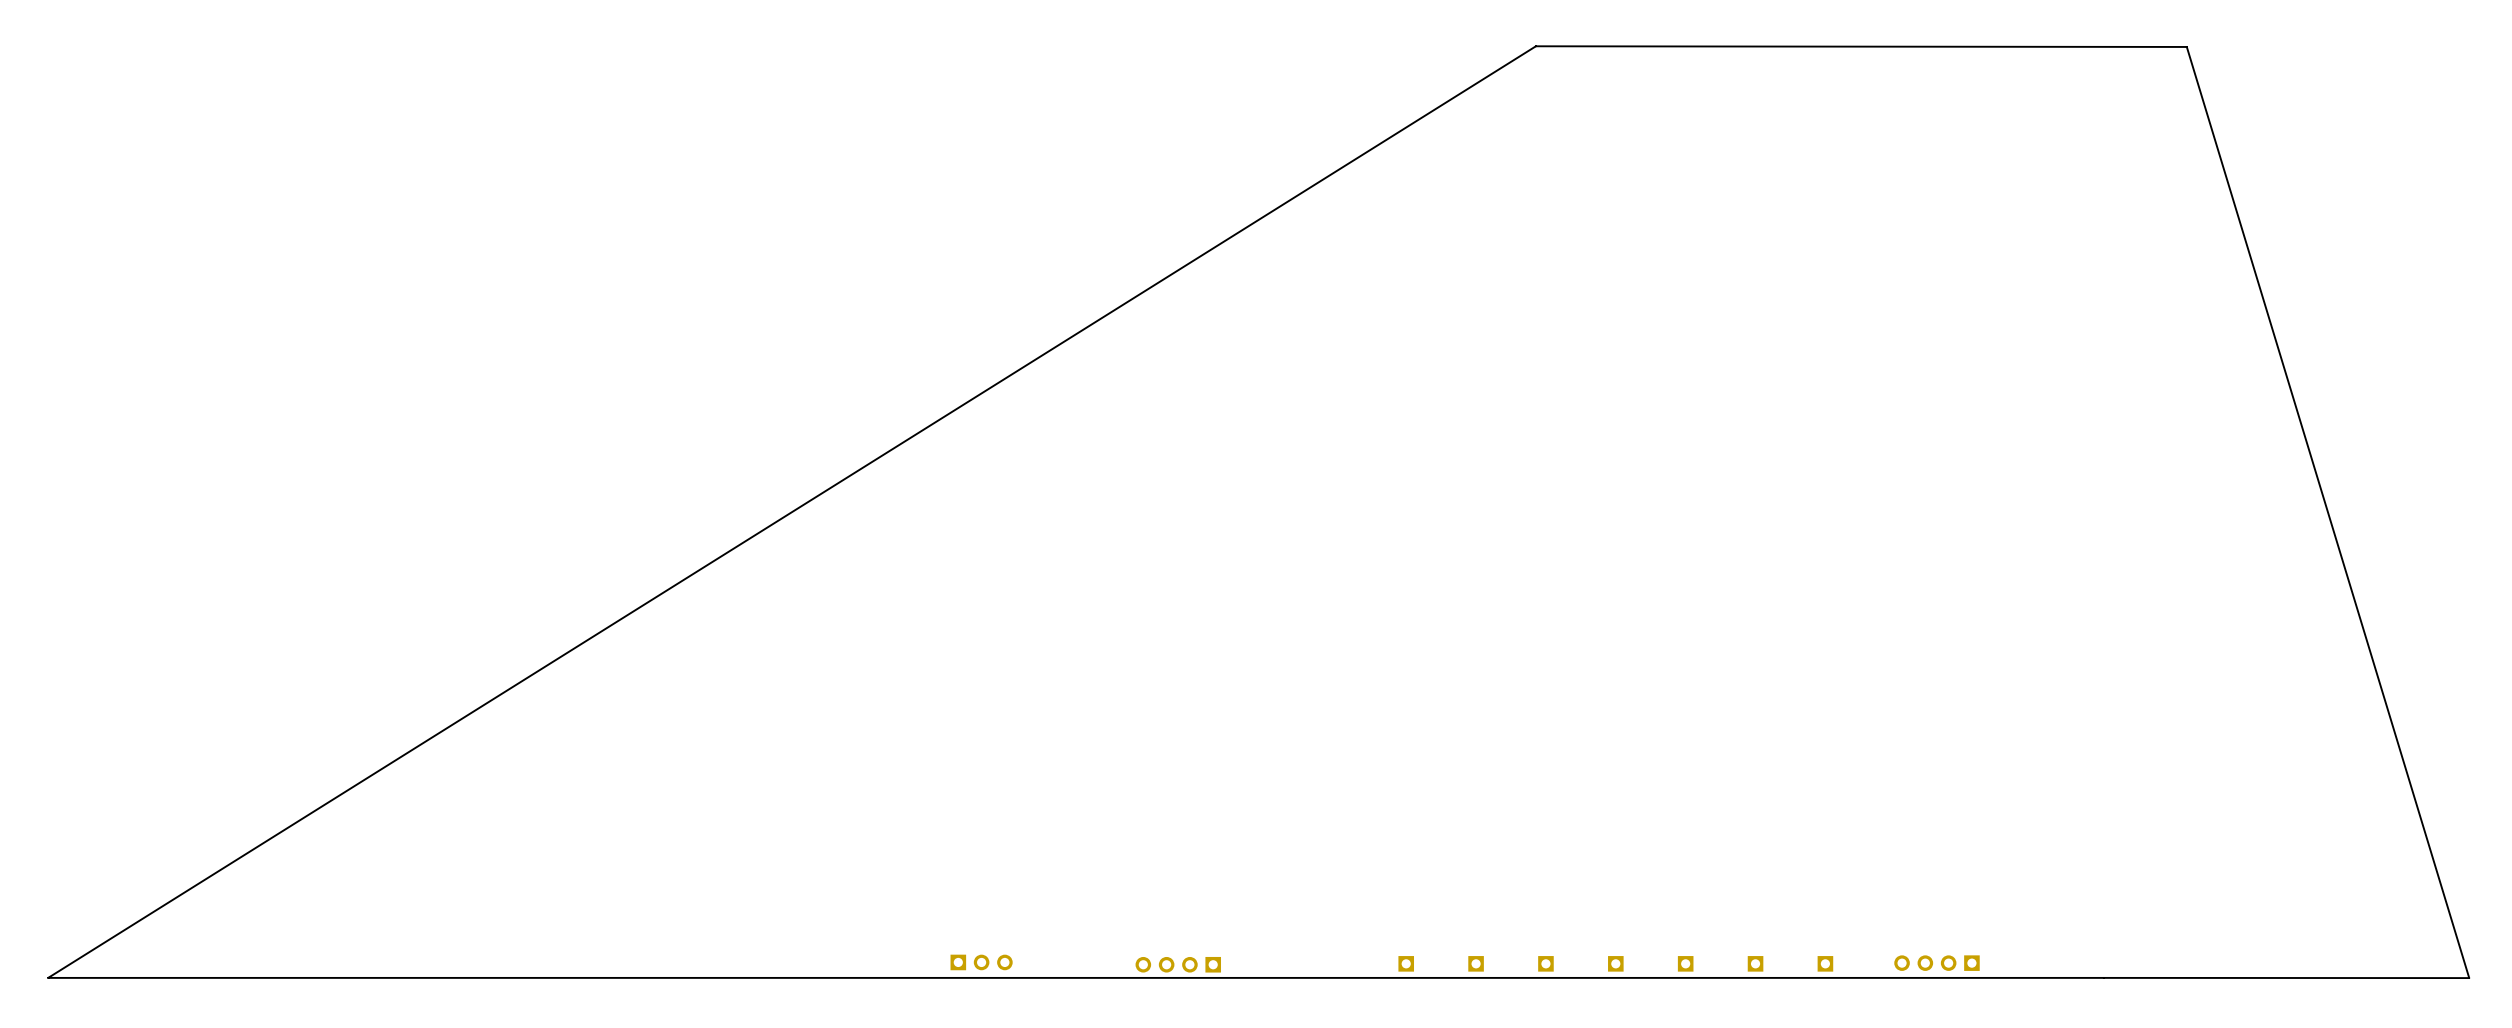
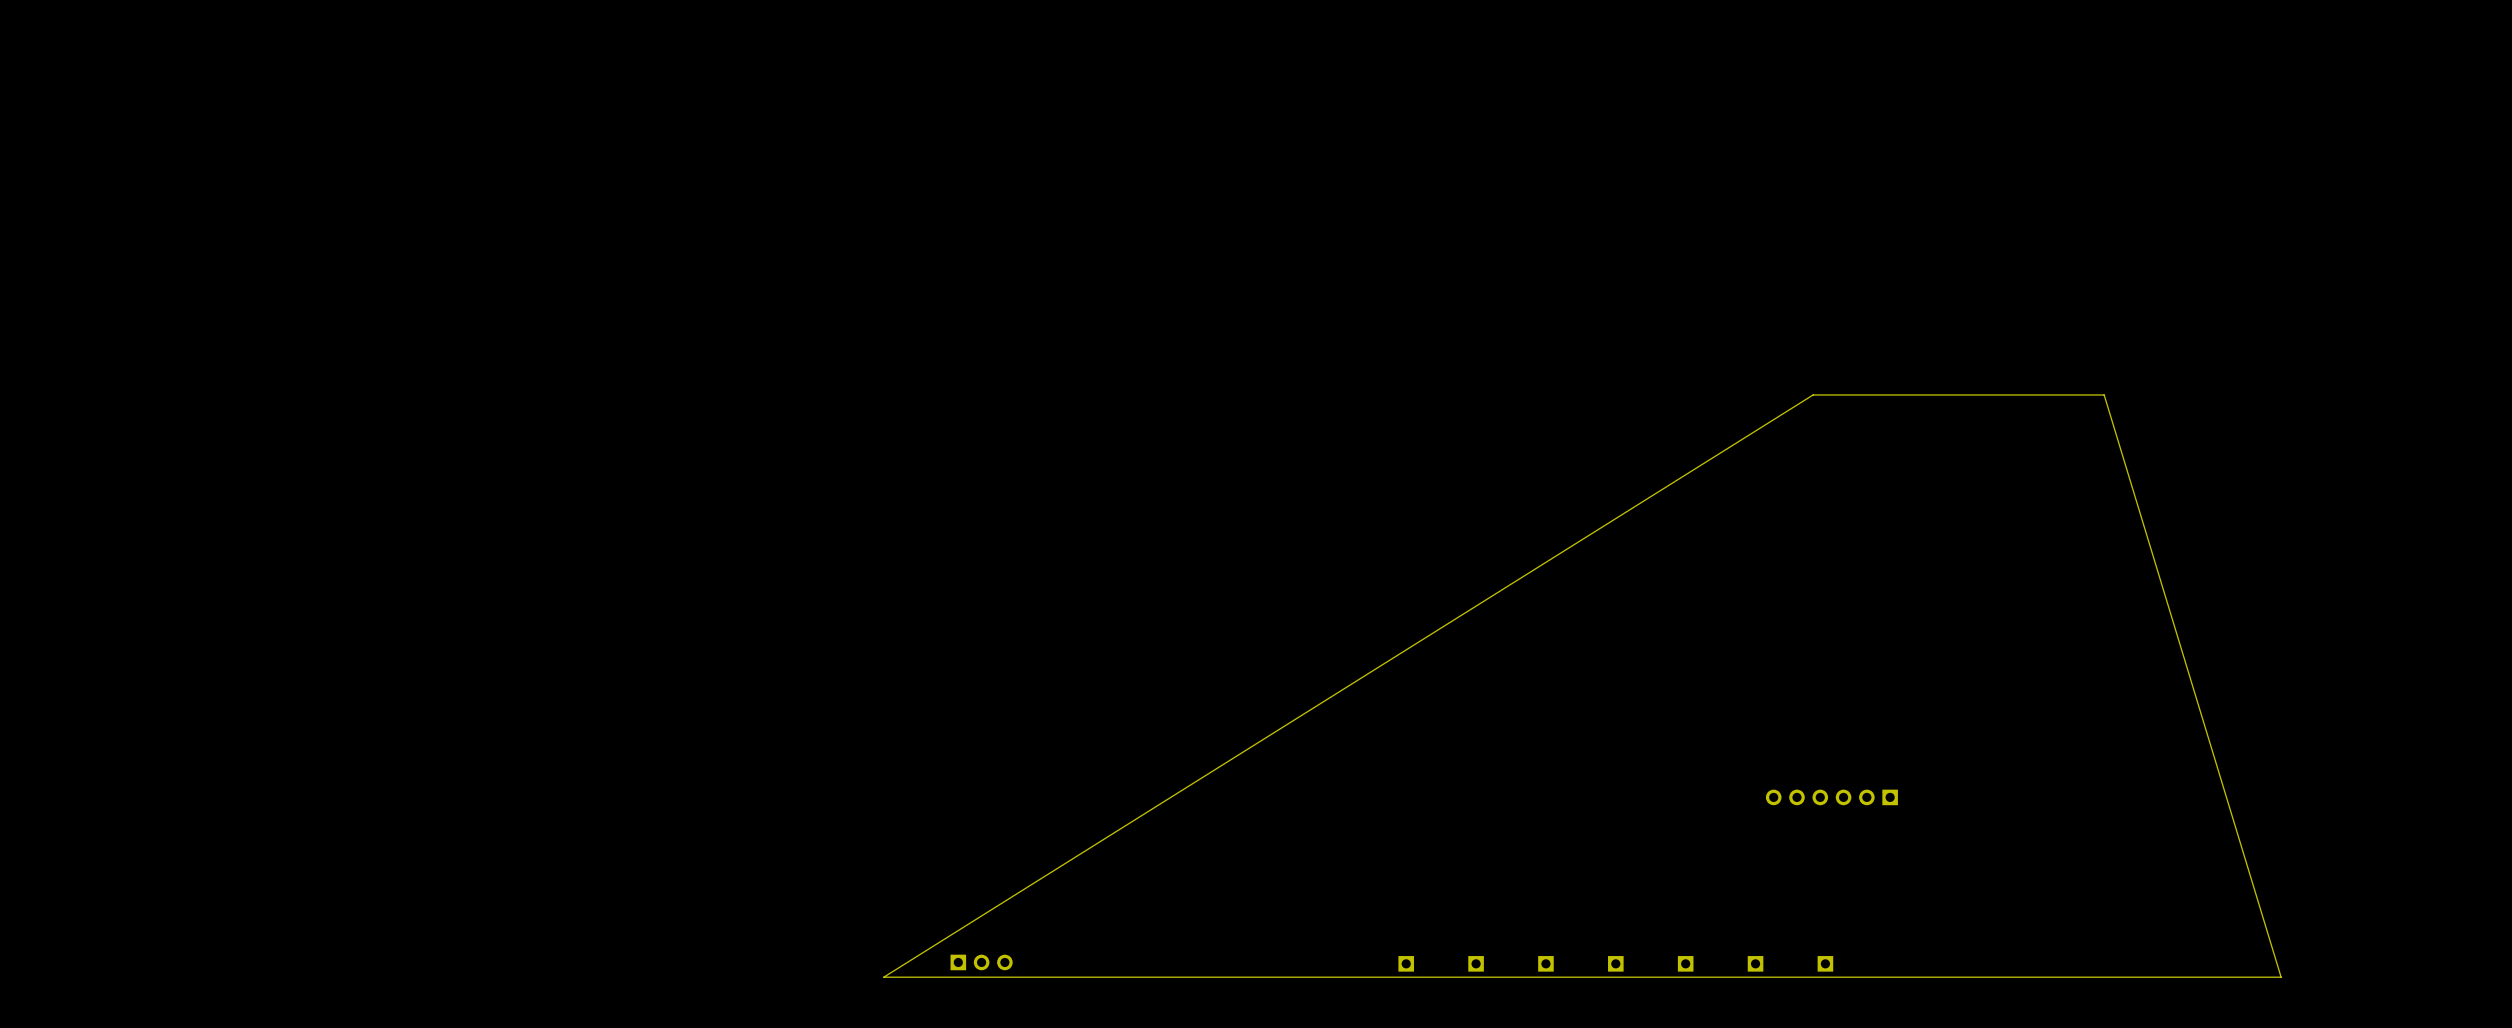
board edge: (1535, 46) (48, 977) (2469, 978) (2186, 46) (1535, 46) -> none
board edge: none -> (2104, 394) (2281, 977) (883, 977) (1813, 394) (2104, 394)
part: none -> (1831, 797)
part: (1937, 963) -> none
part: (1178, 964) -> none

